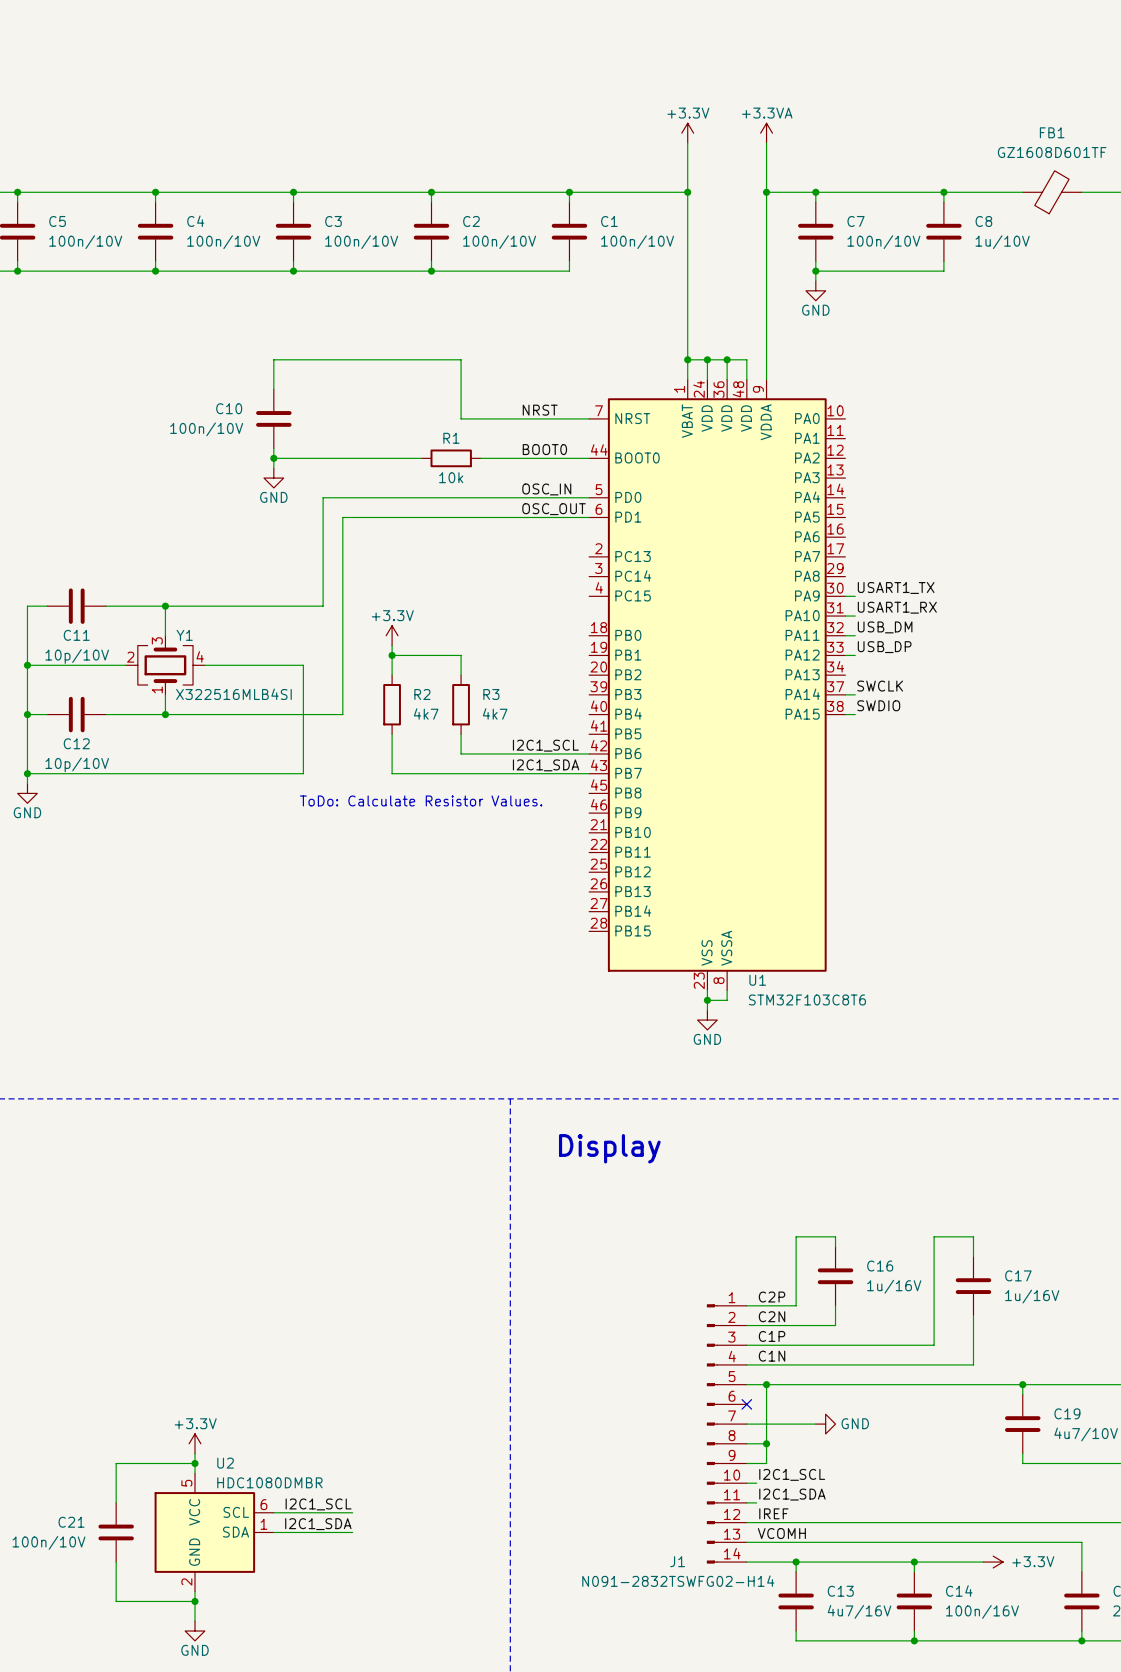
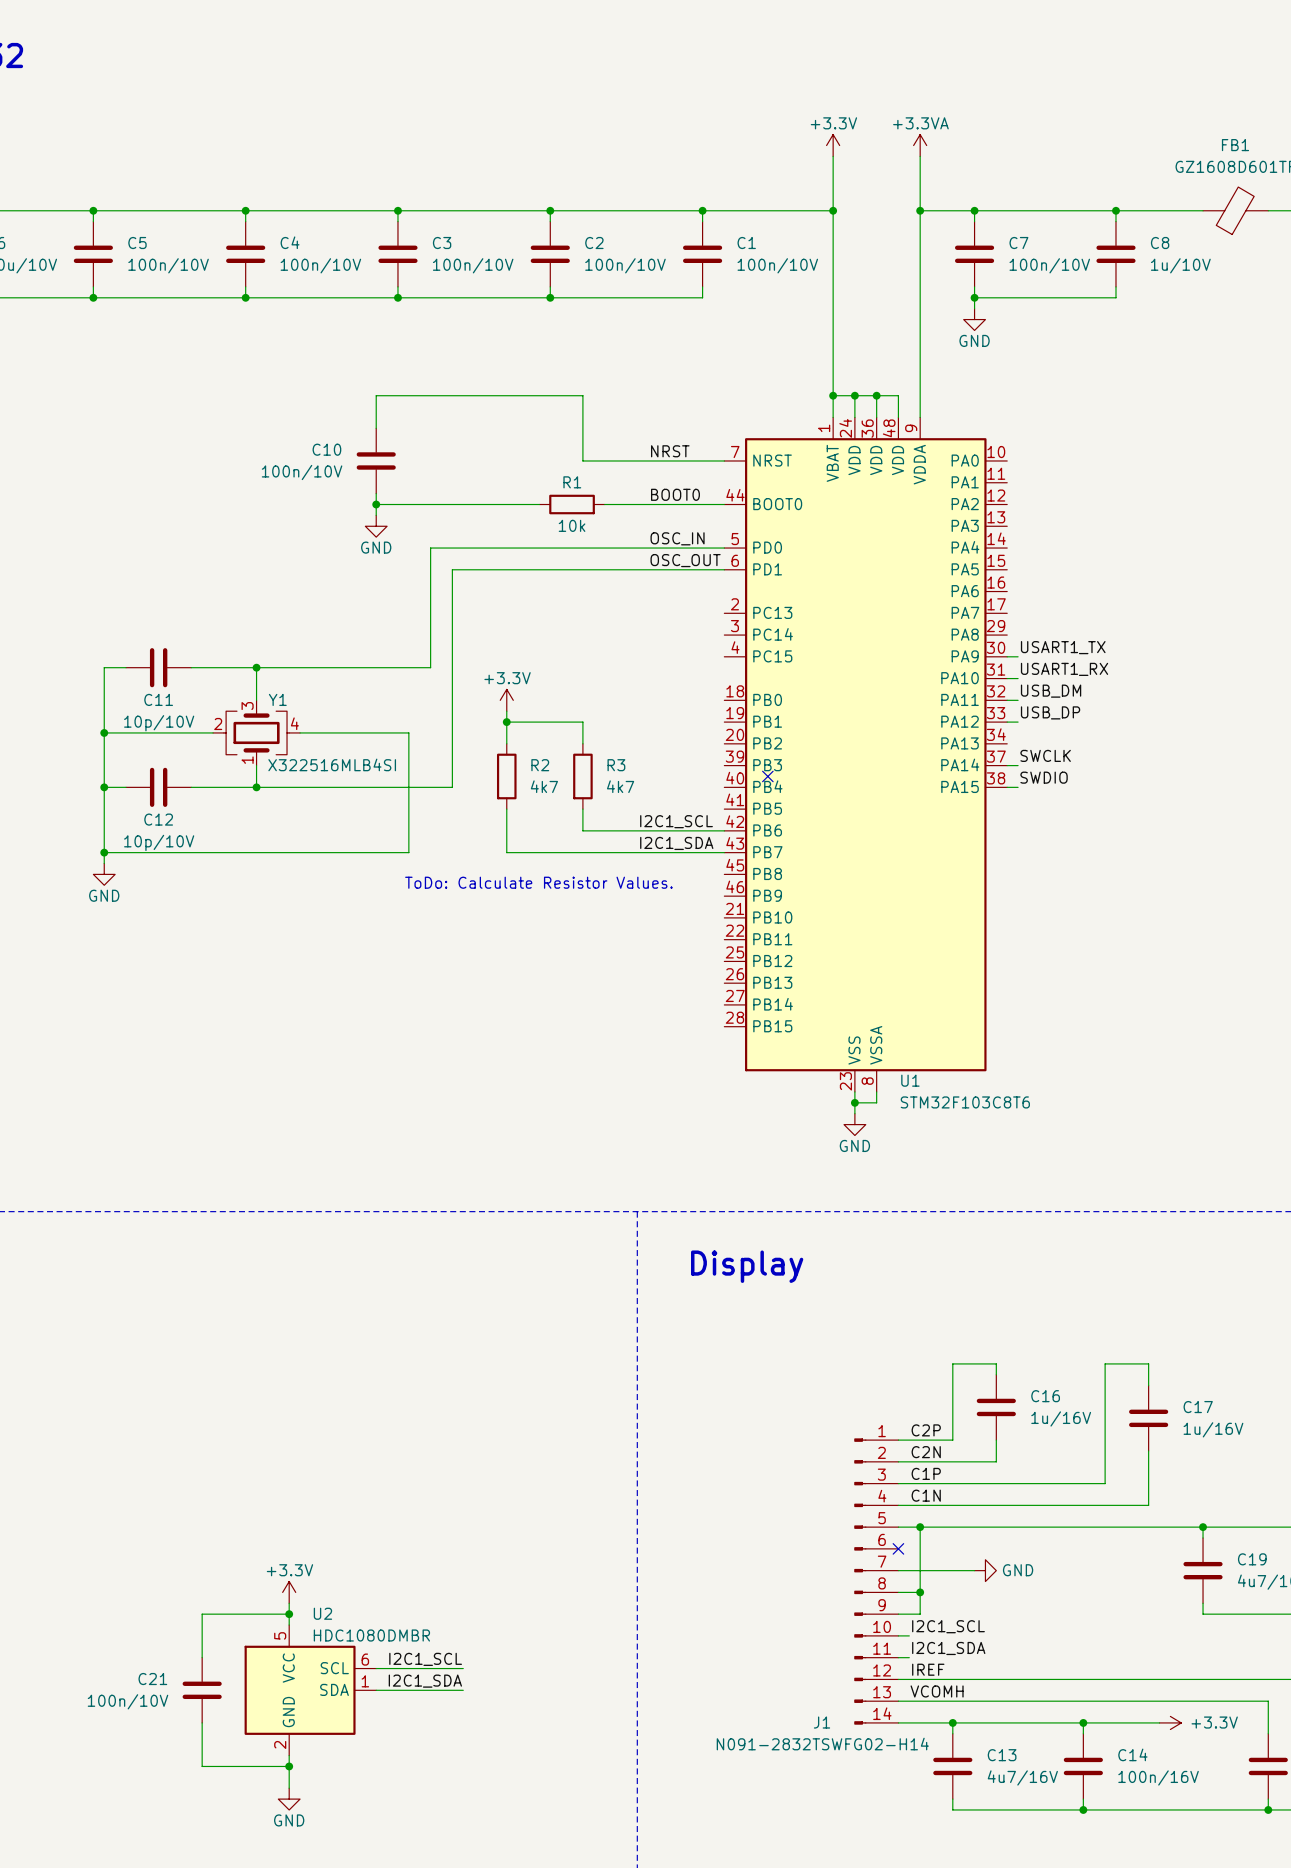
no-connect mark: none -> (767, 776)

